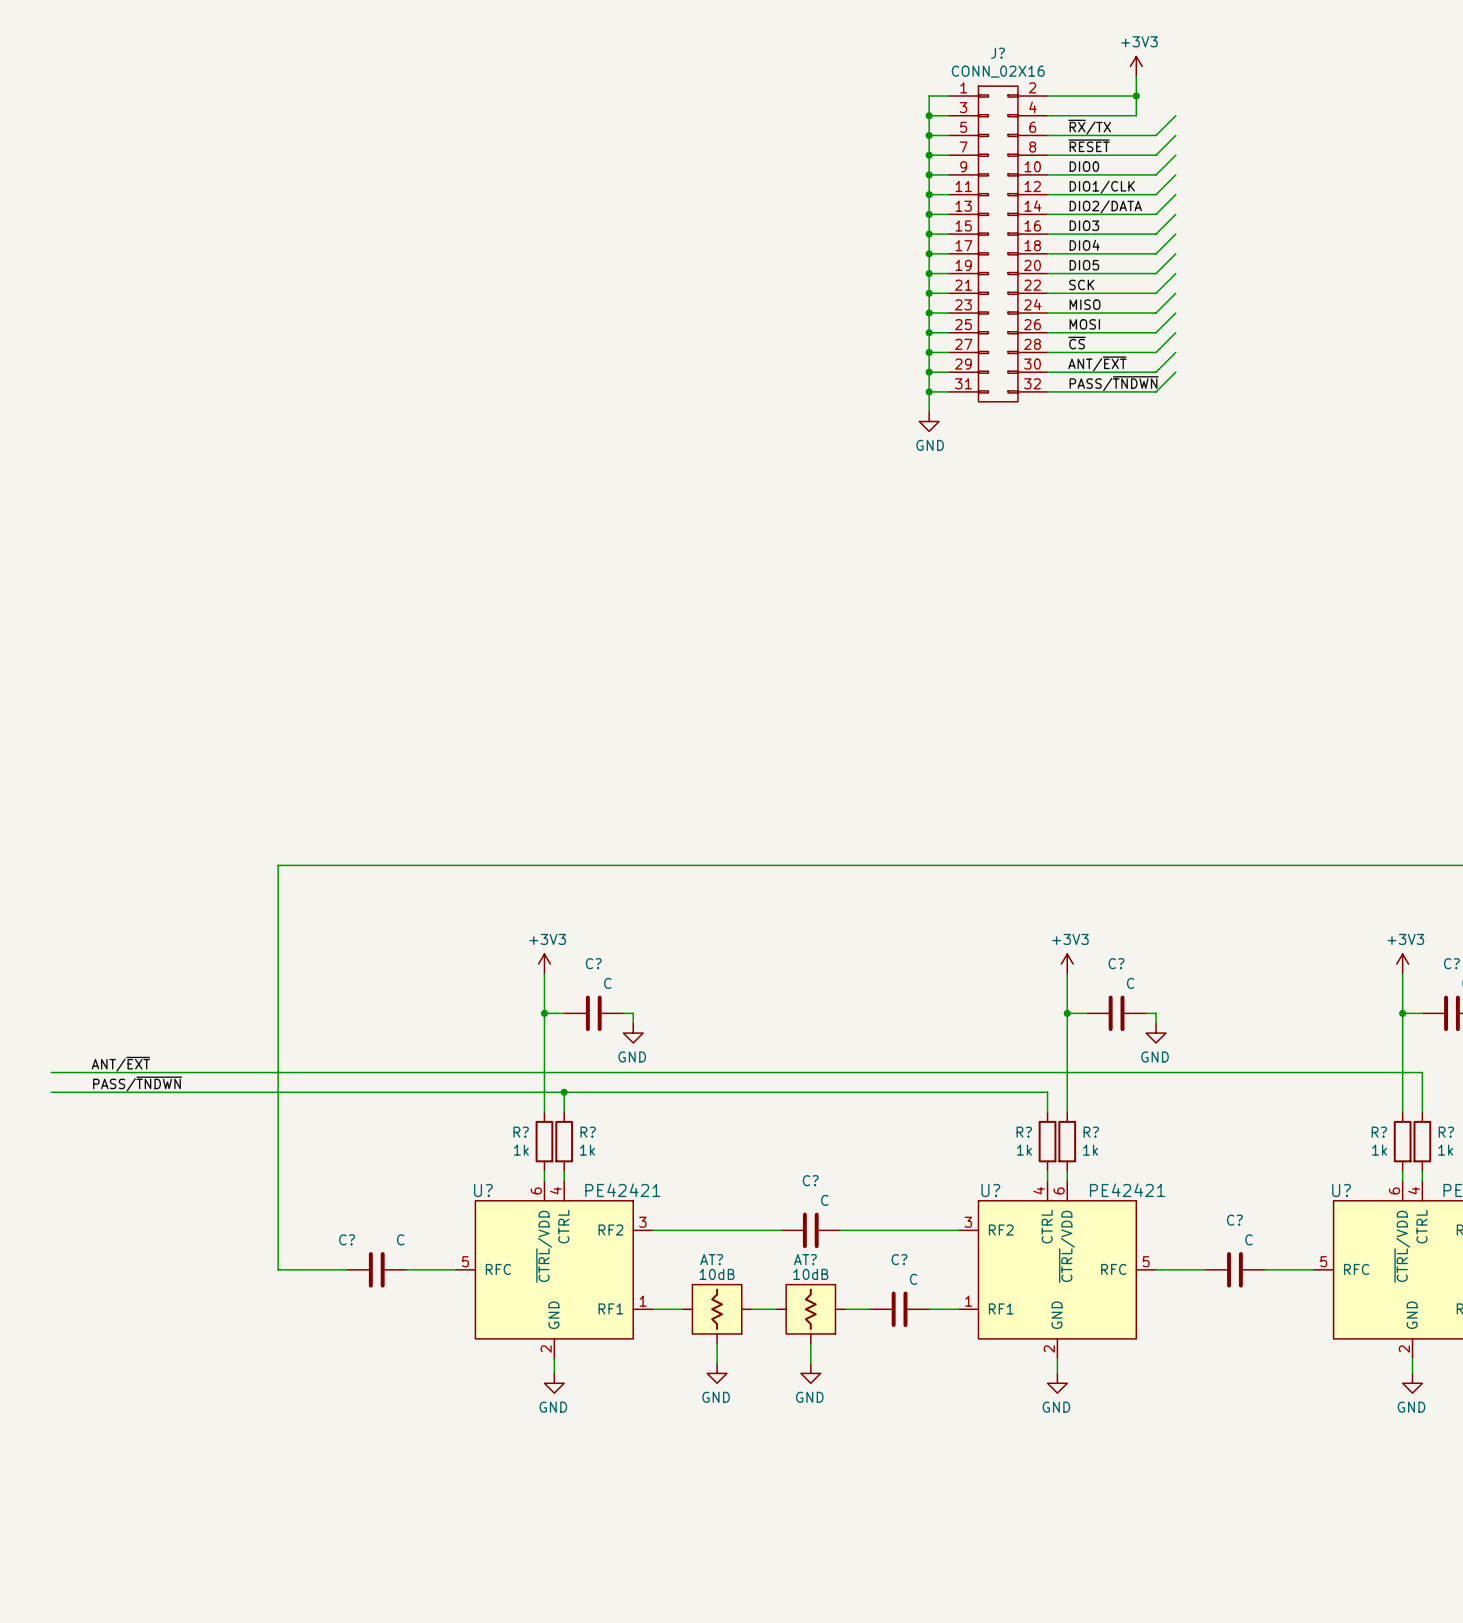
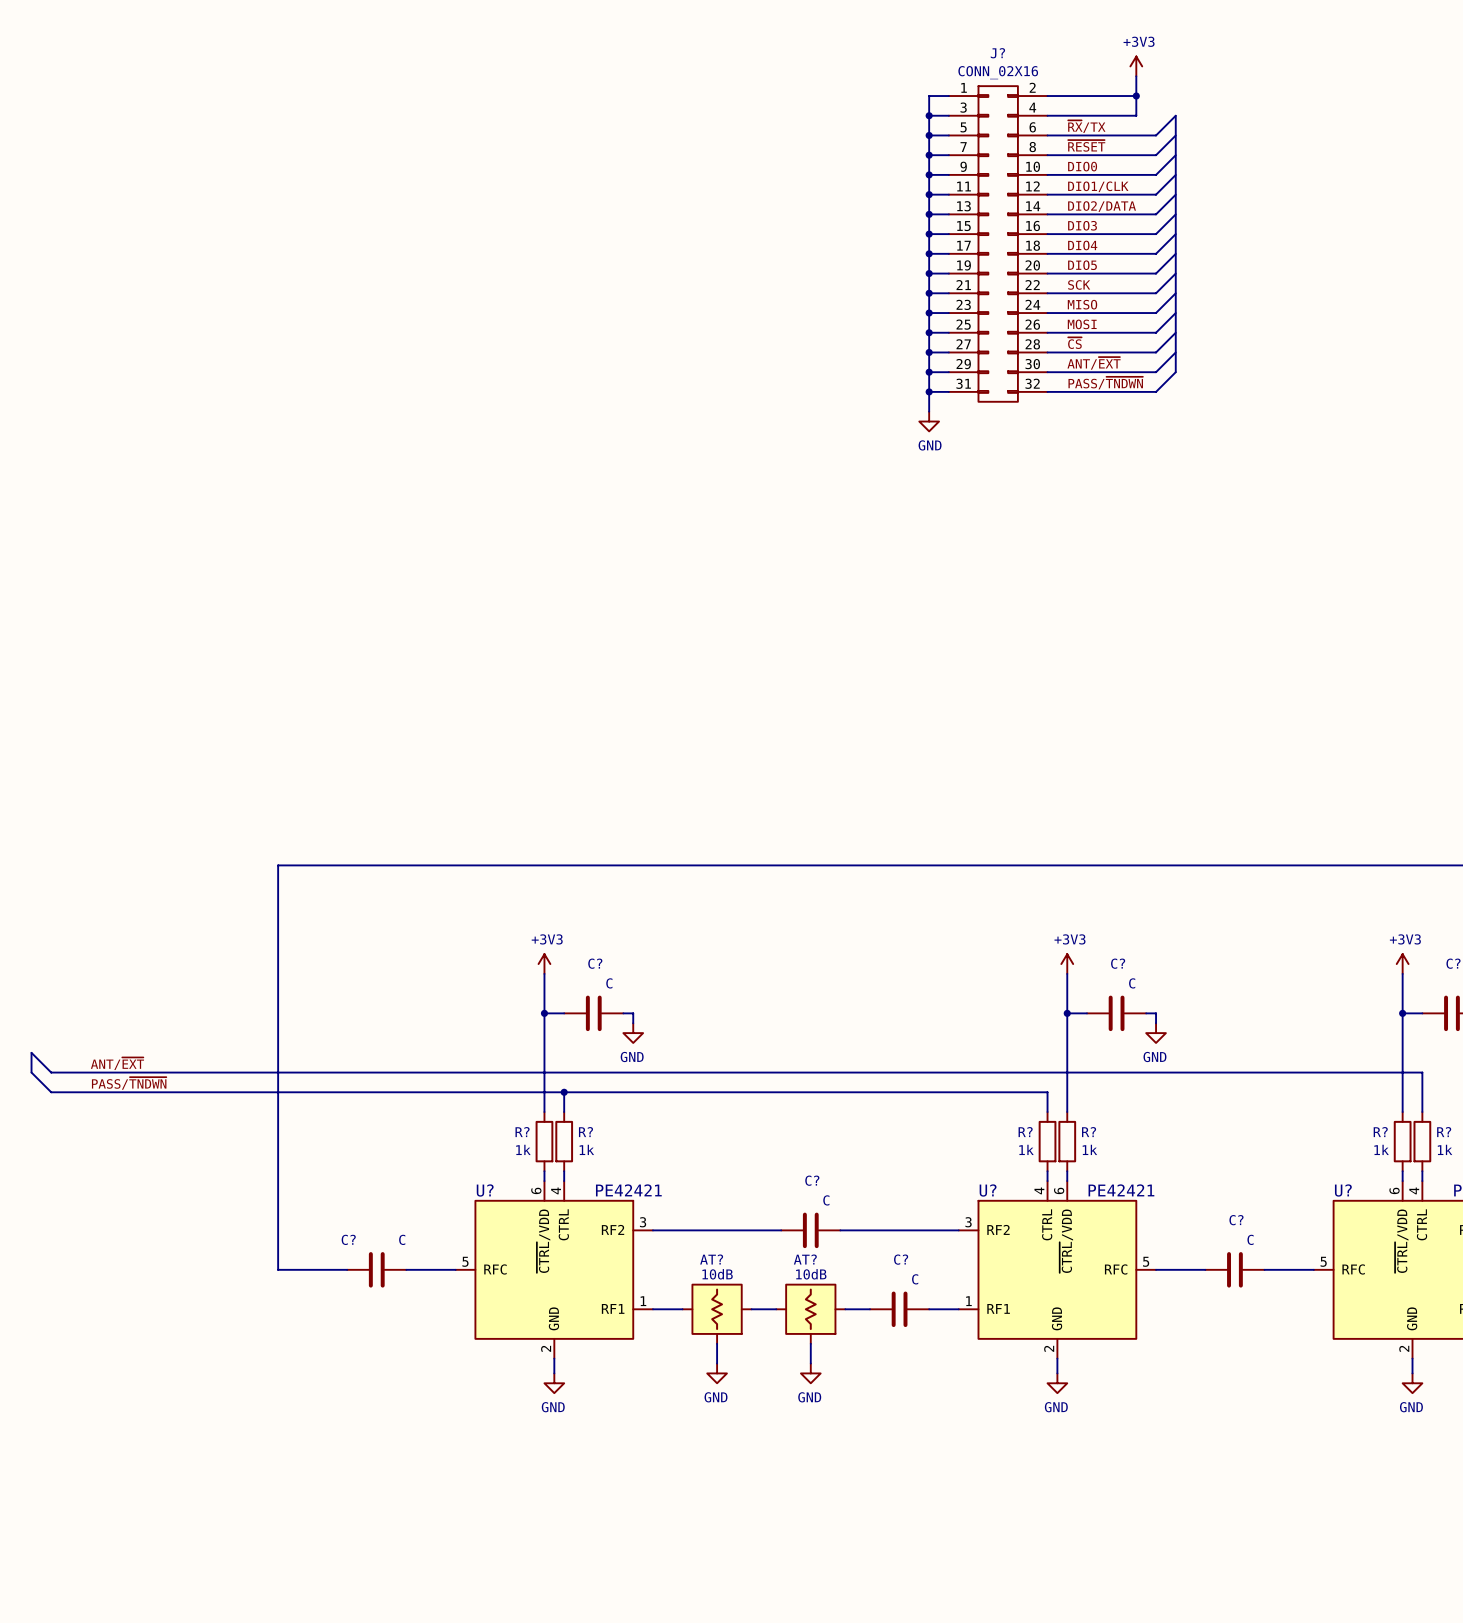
bus: none -> (1175, 115) (1175, 372)
wire: none -> (31, 1052) (51, 1072)
bus: none -> (31, 1052) (31, 1072)
wire: none -> (31, 1072) (51, 1092)

